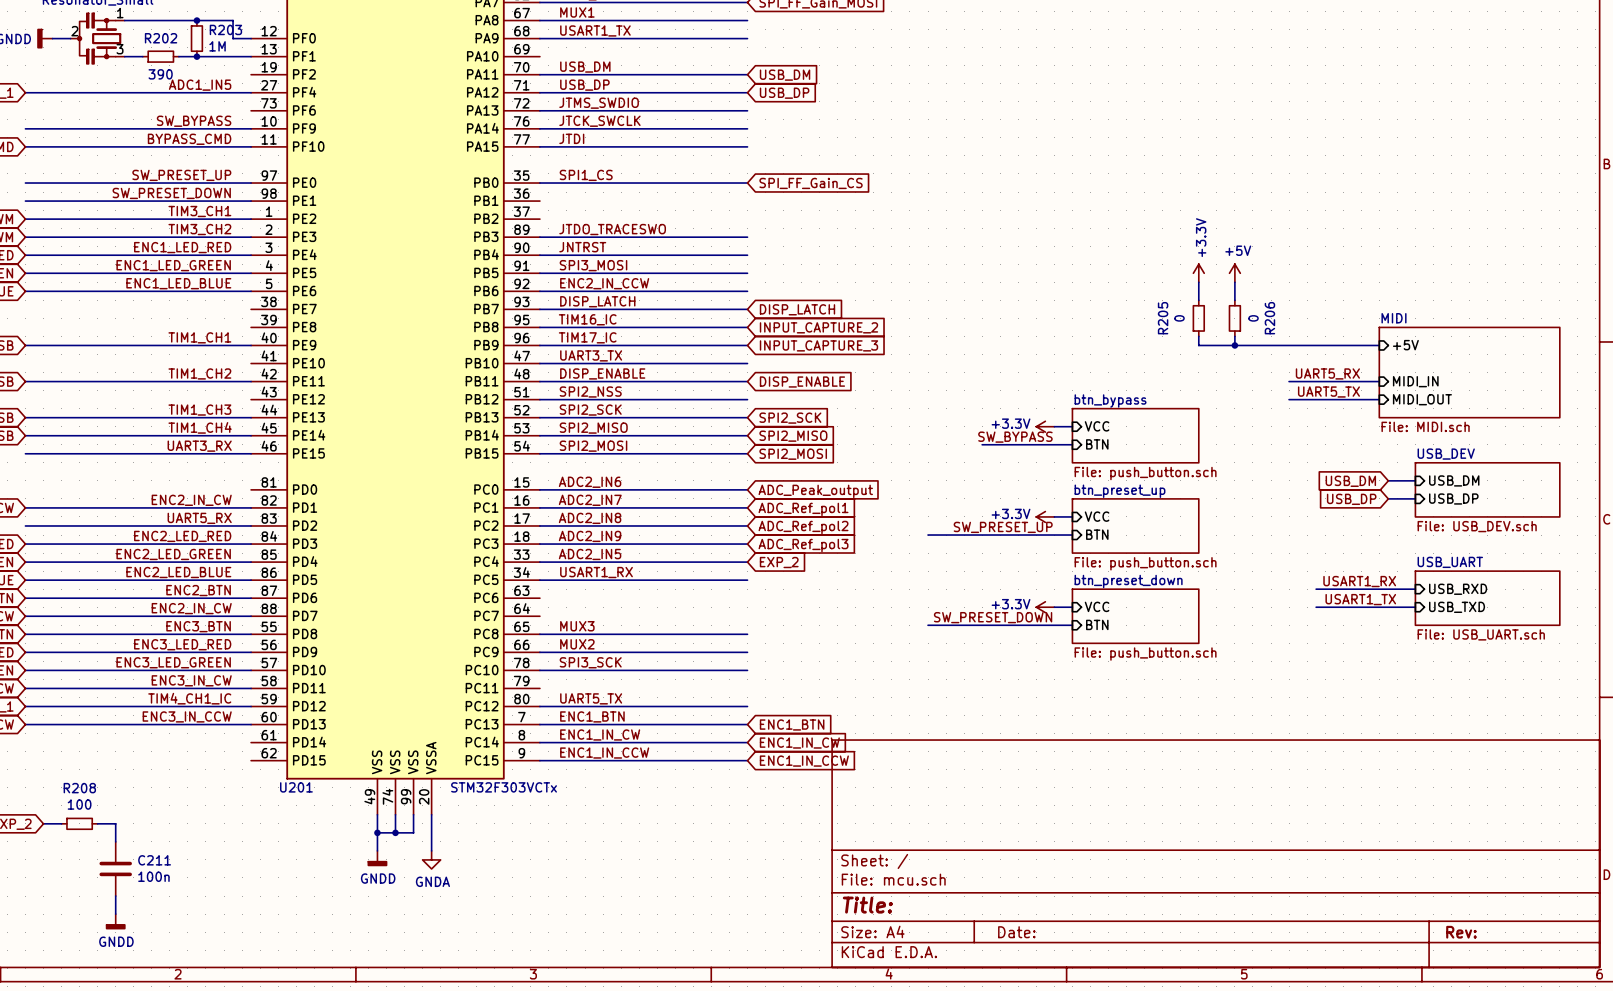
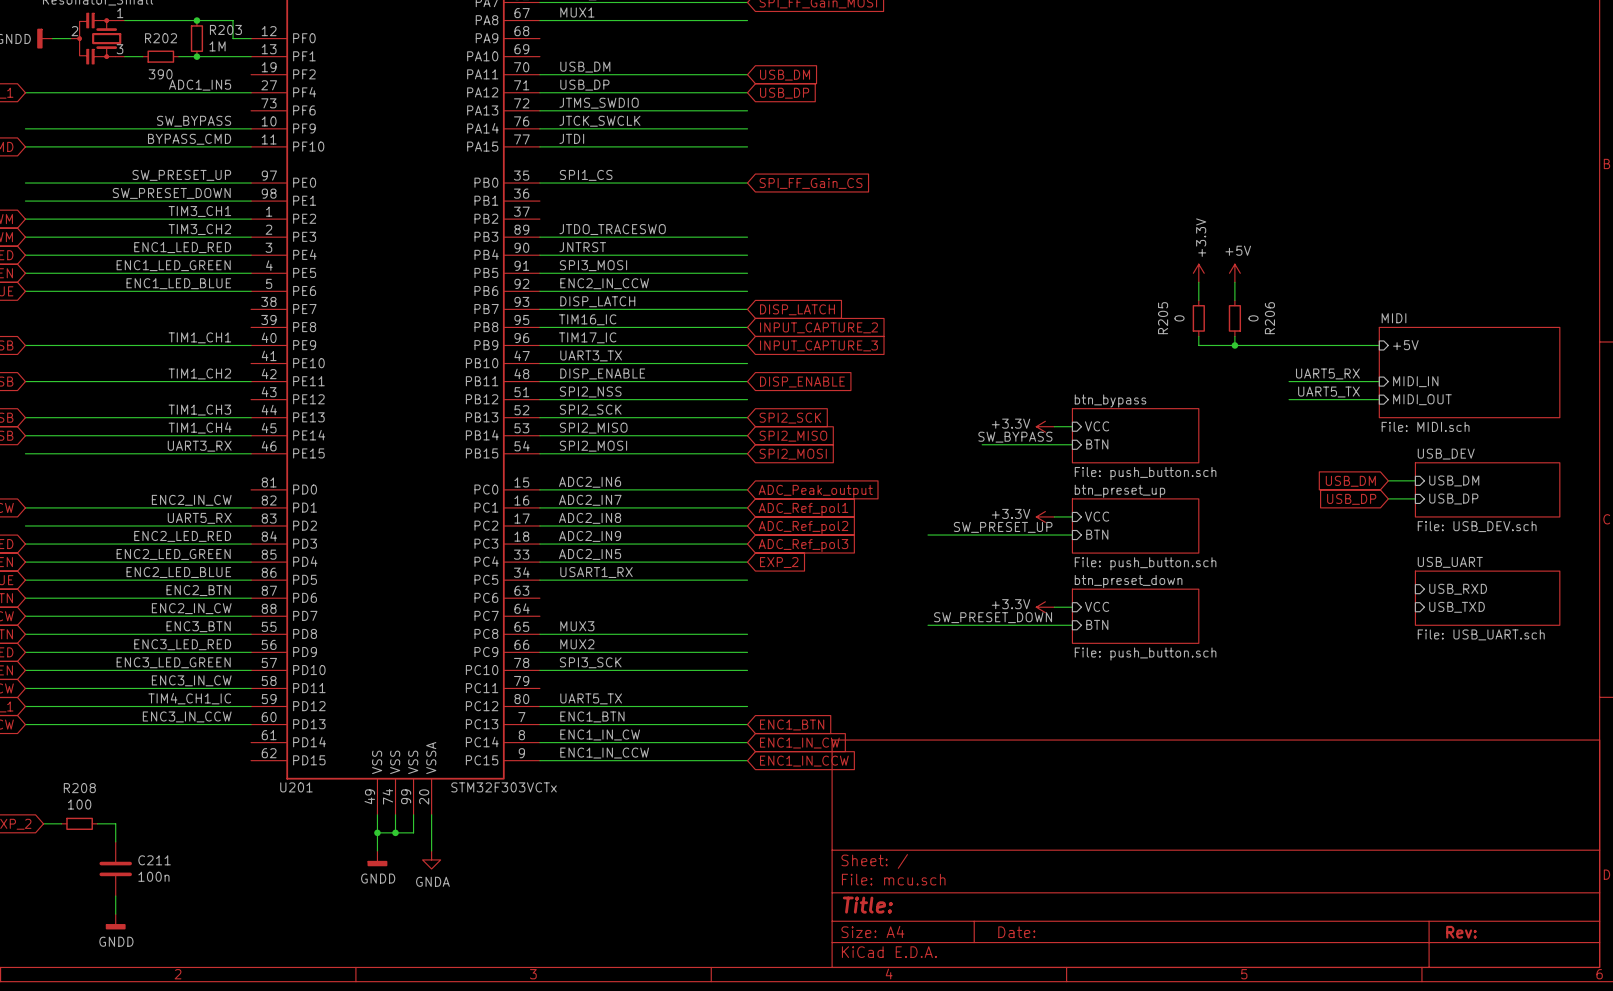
label: USART1_TX (595, 30) -> none
wire: (539, 38) (747, 38) -> none
label: USART1_RX (1359, 581) -> none
wire: (1316, 589) (1415, 589) -> none
label: USART1_TX (1360, 599) -> none
wire: (1316, 607) (1415, 607) -> none

